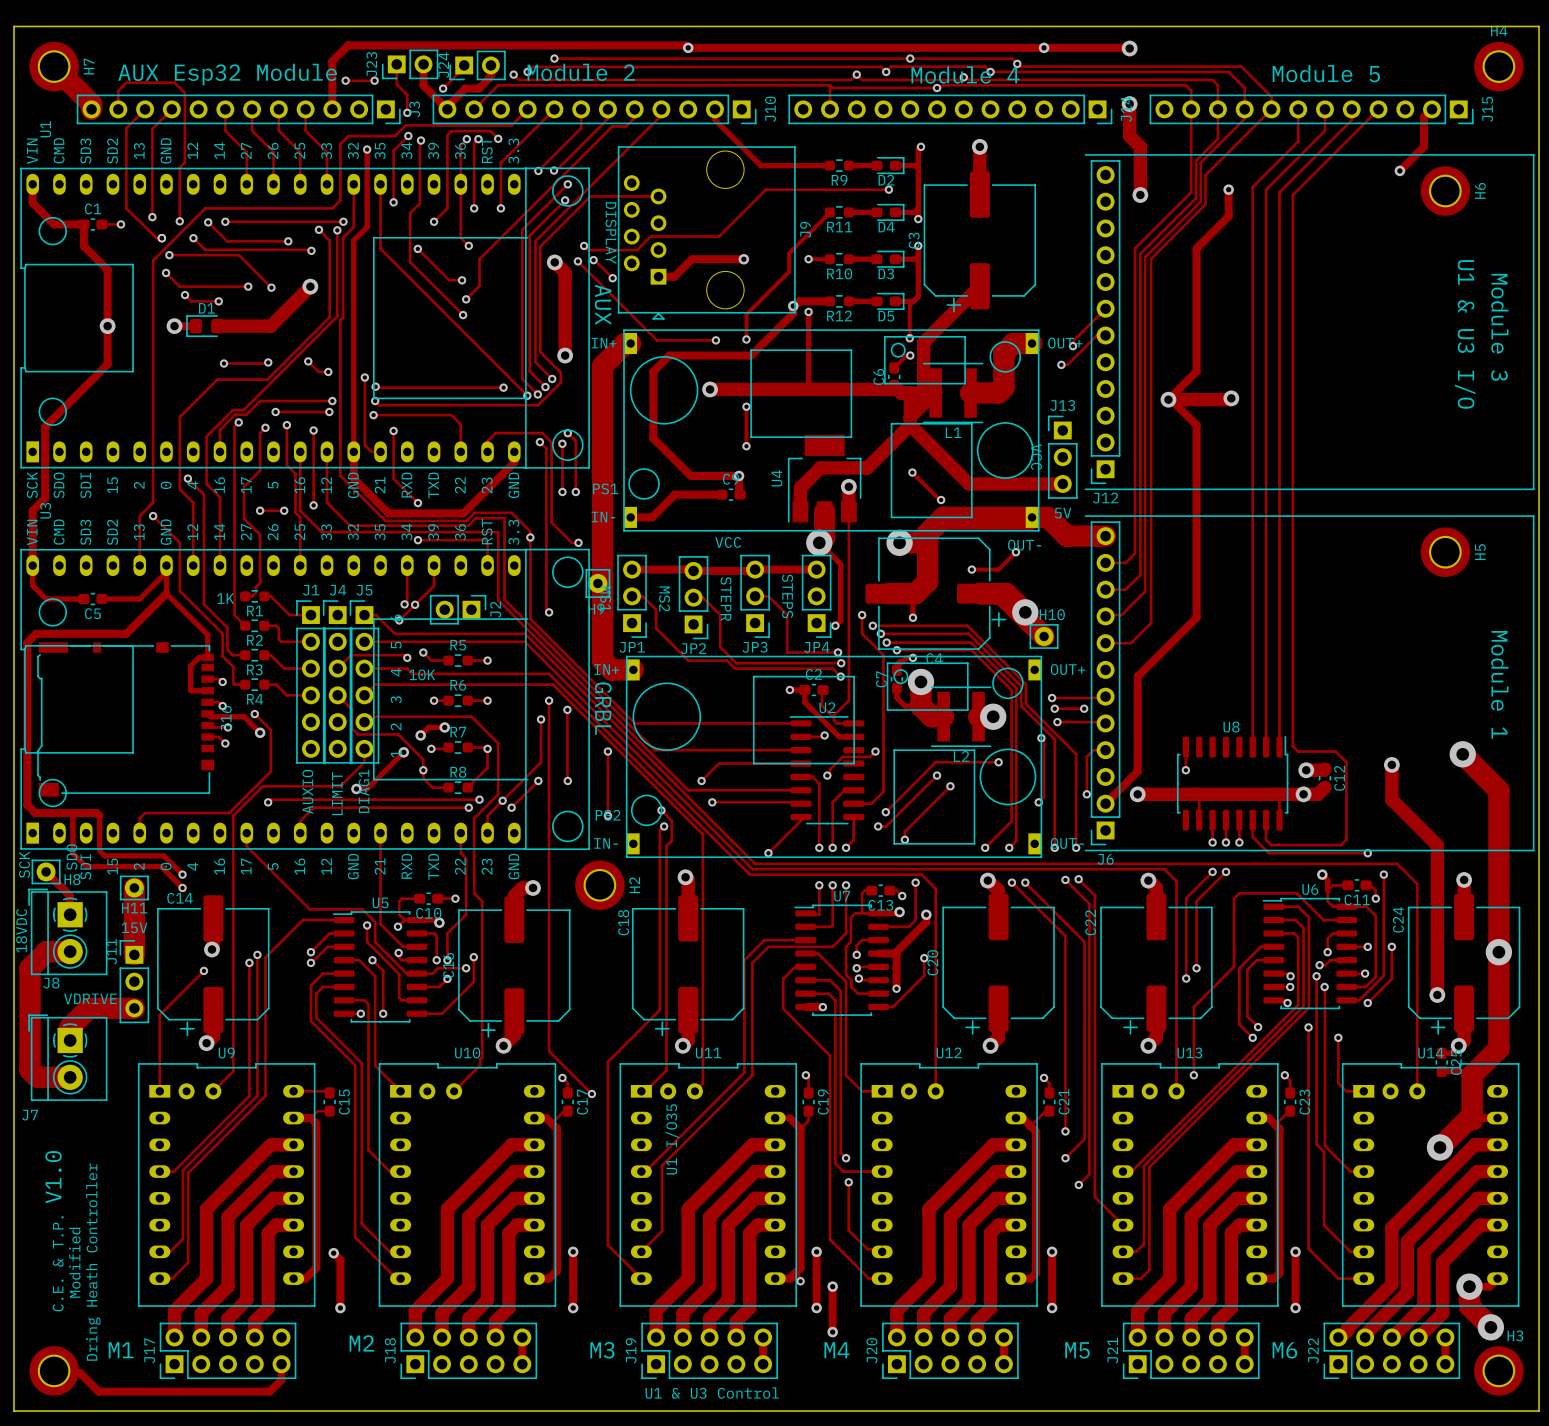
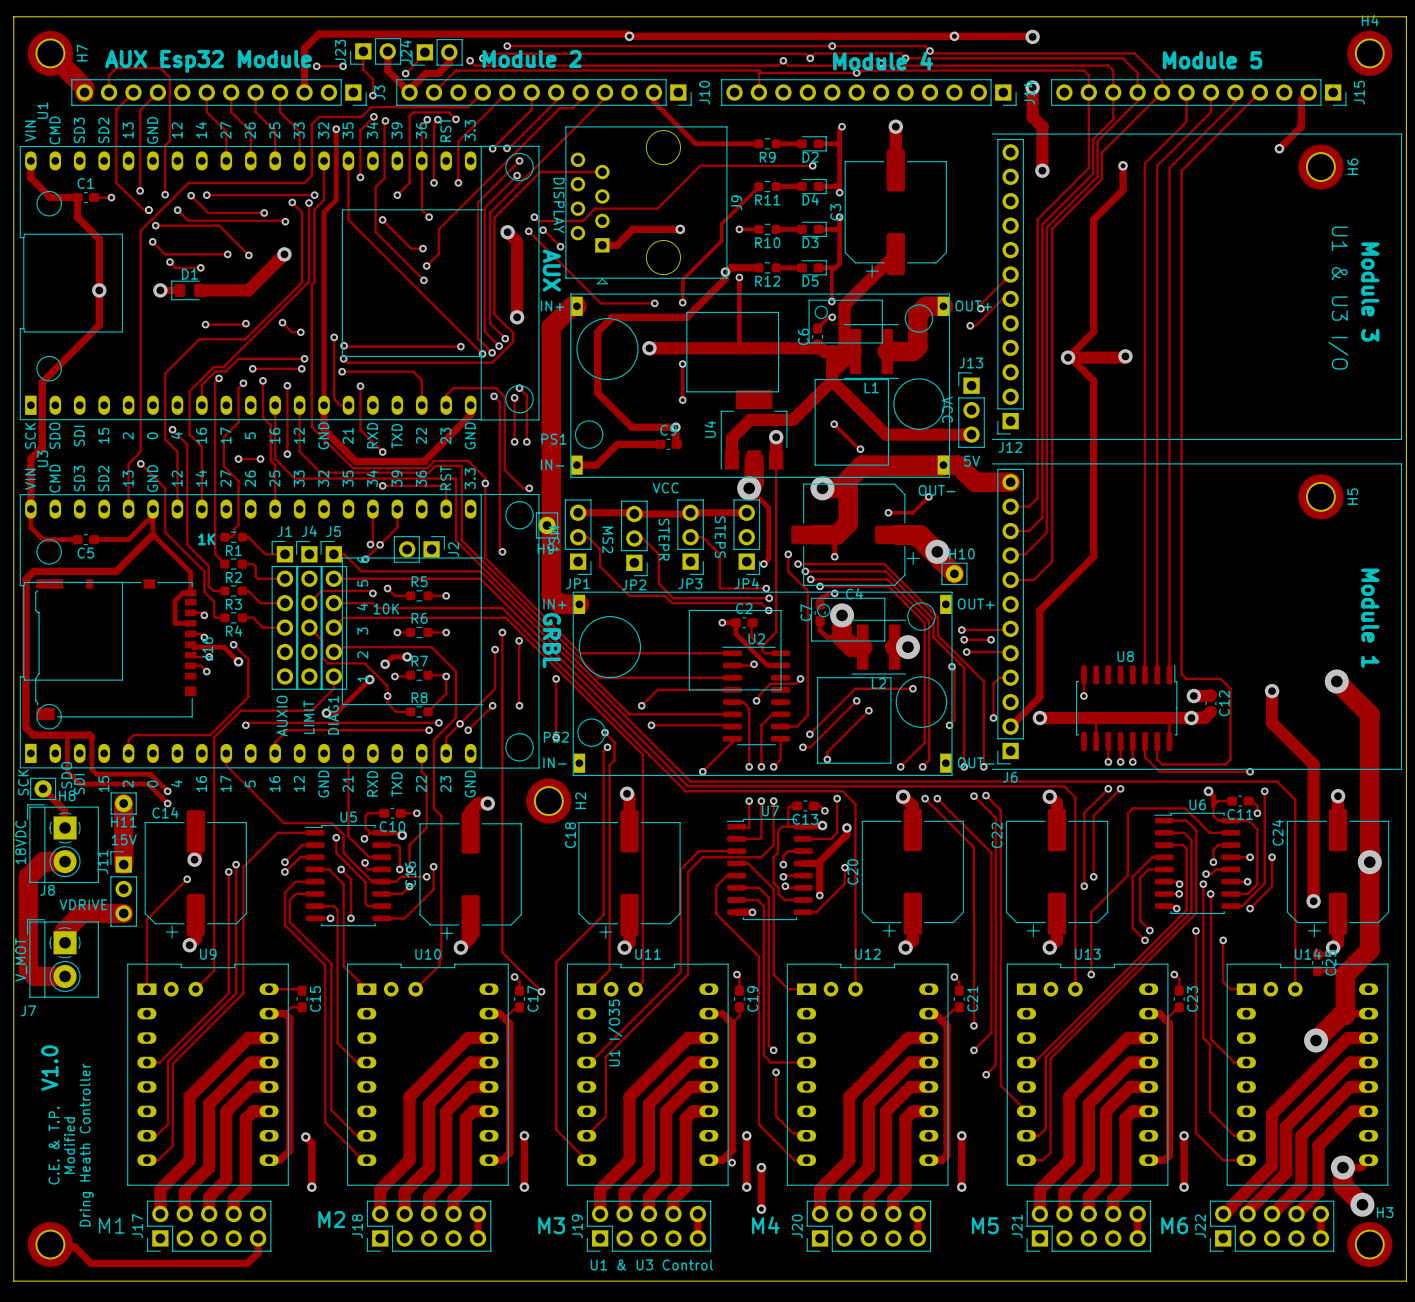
text: none -> V_MOT (21, 959)

